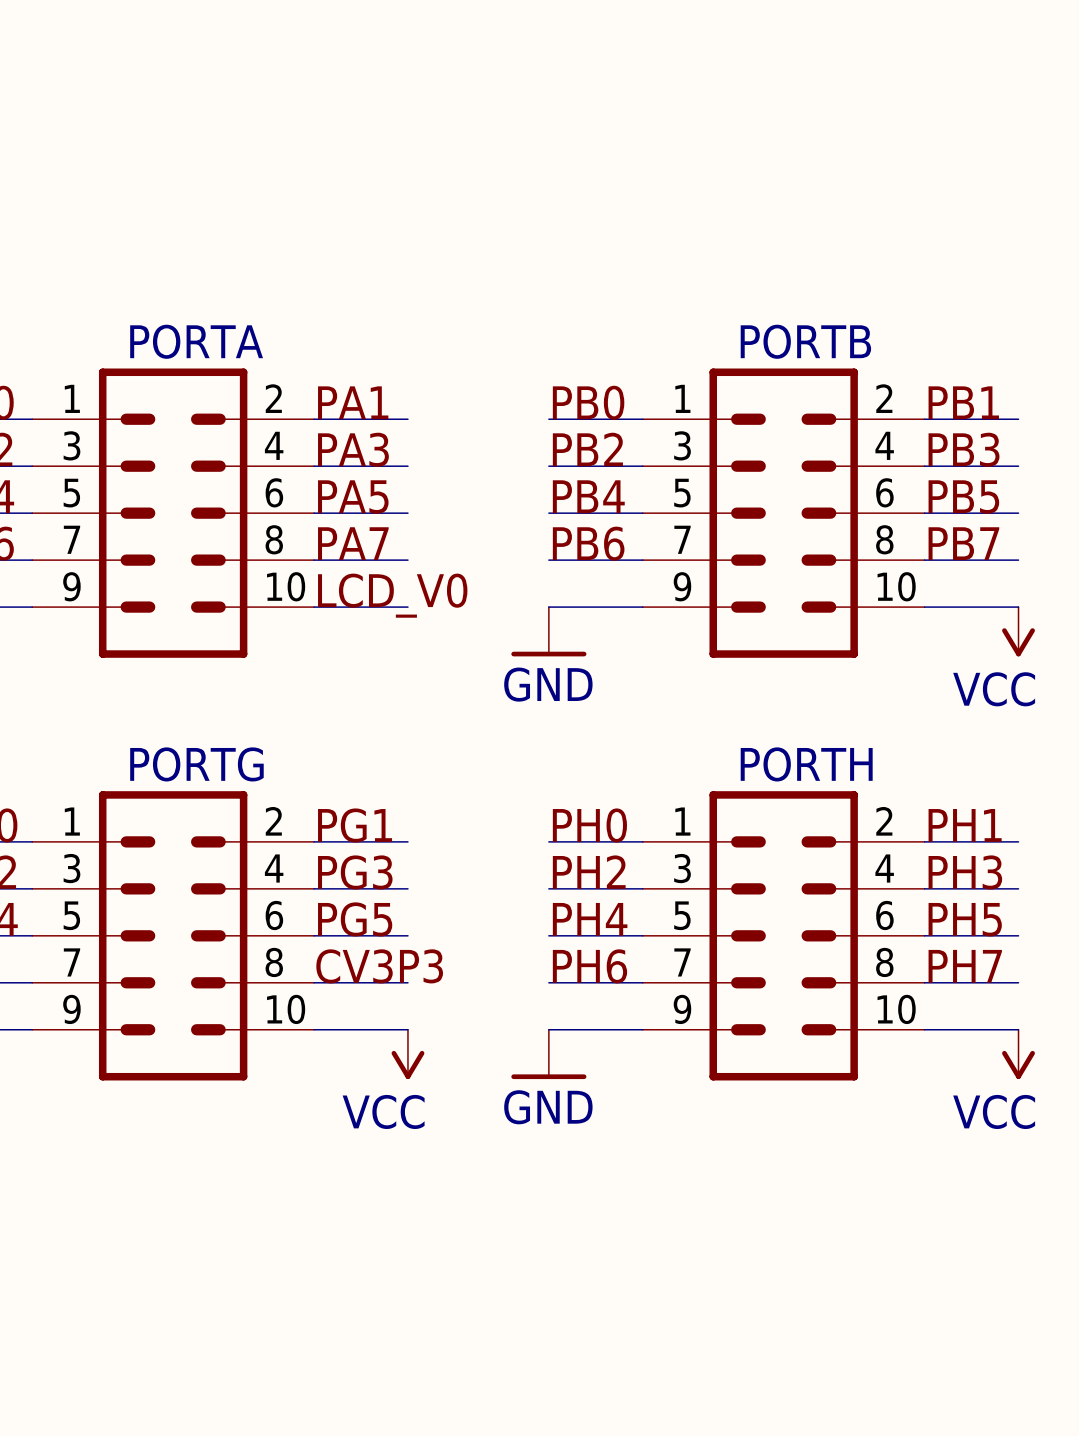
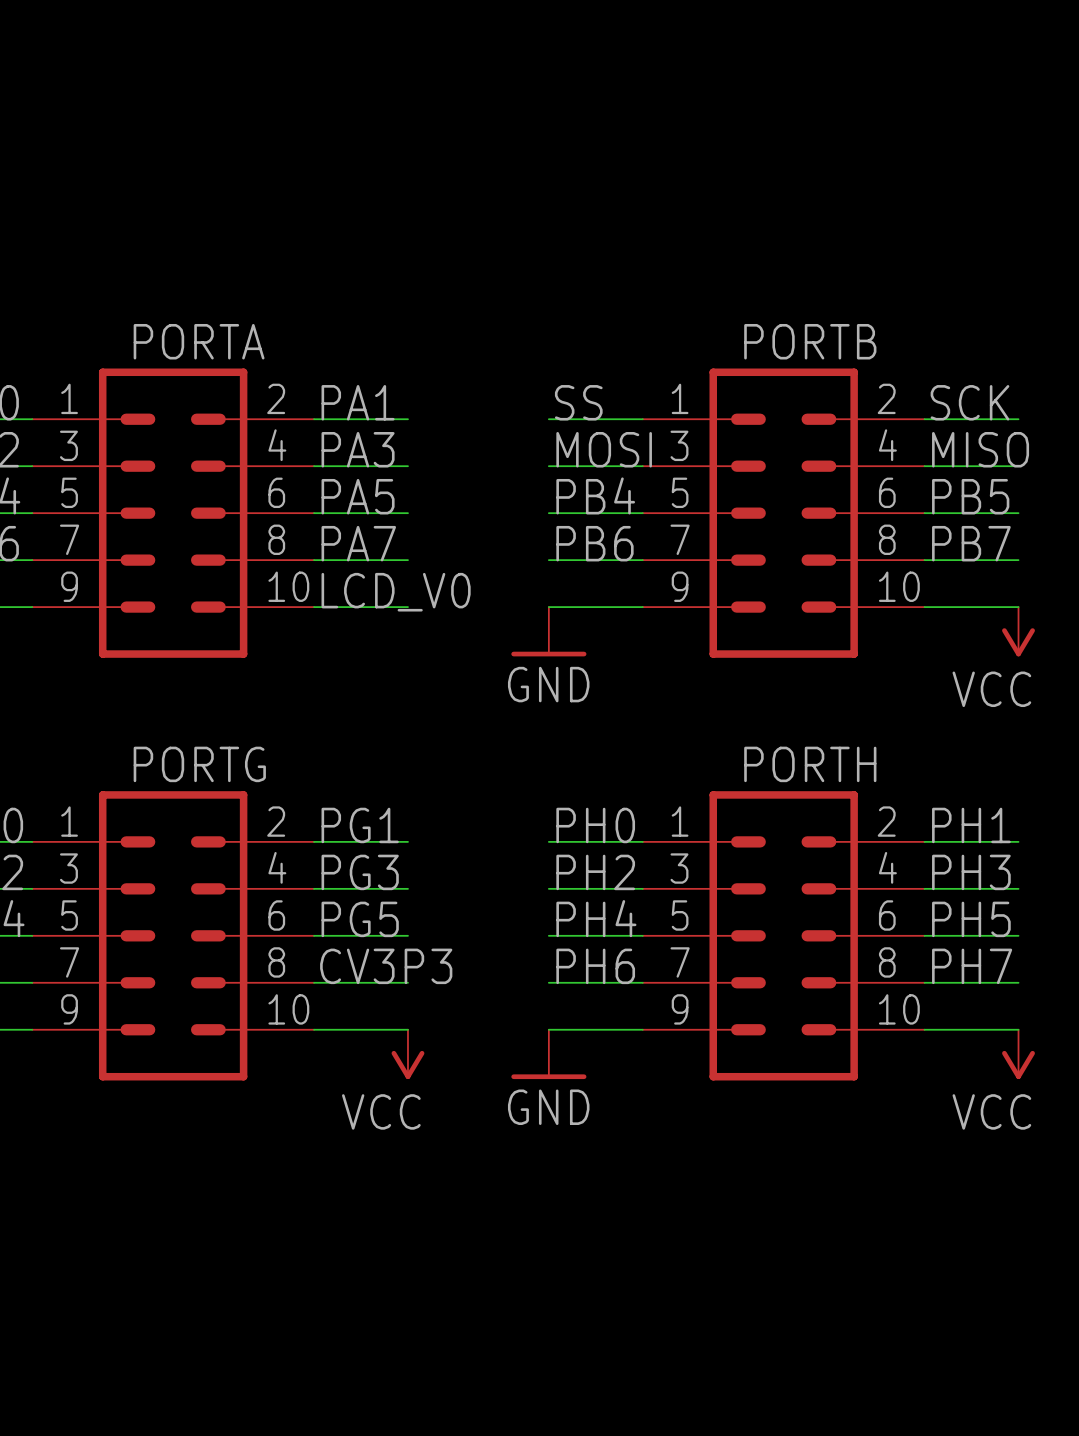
label: PB0 (588, 402) -> SS (578, 402)
label: PB1 (963, 402) -> SCK (969, 402)
label: PB2 (587, 449) -> MOSI (604, 449)
label: PB3 (964, 449) -> MISO (980, 449)

